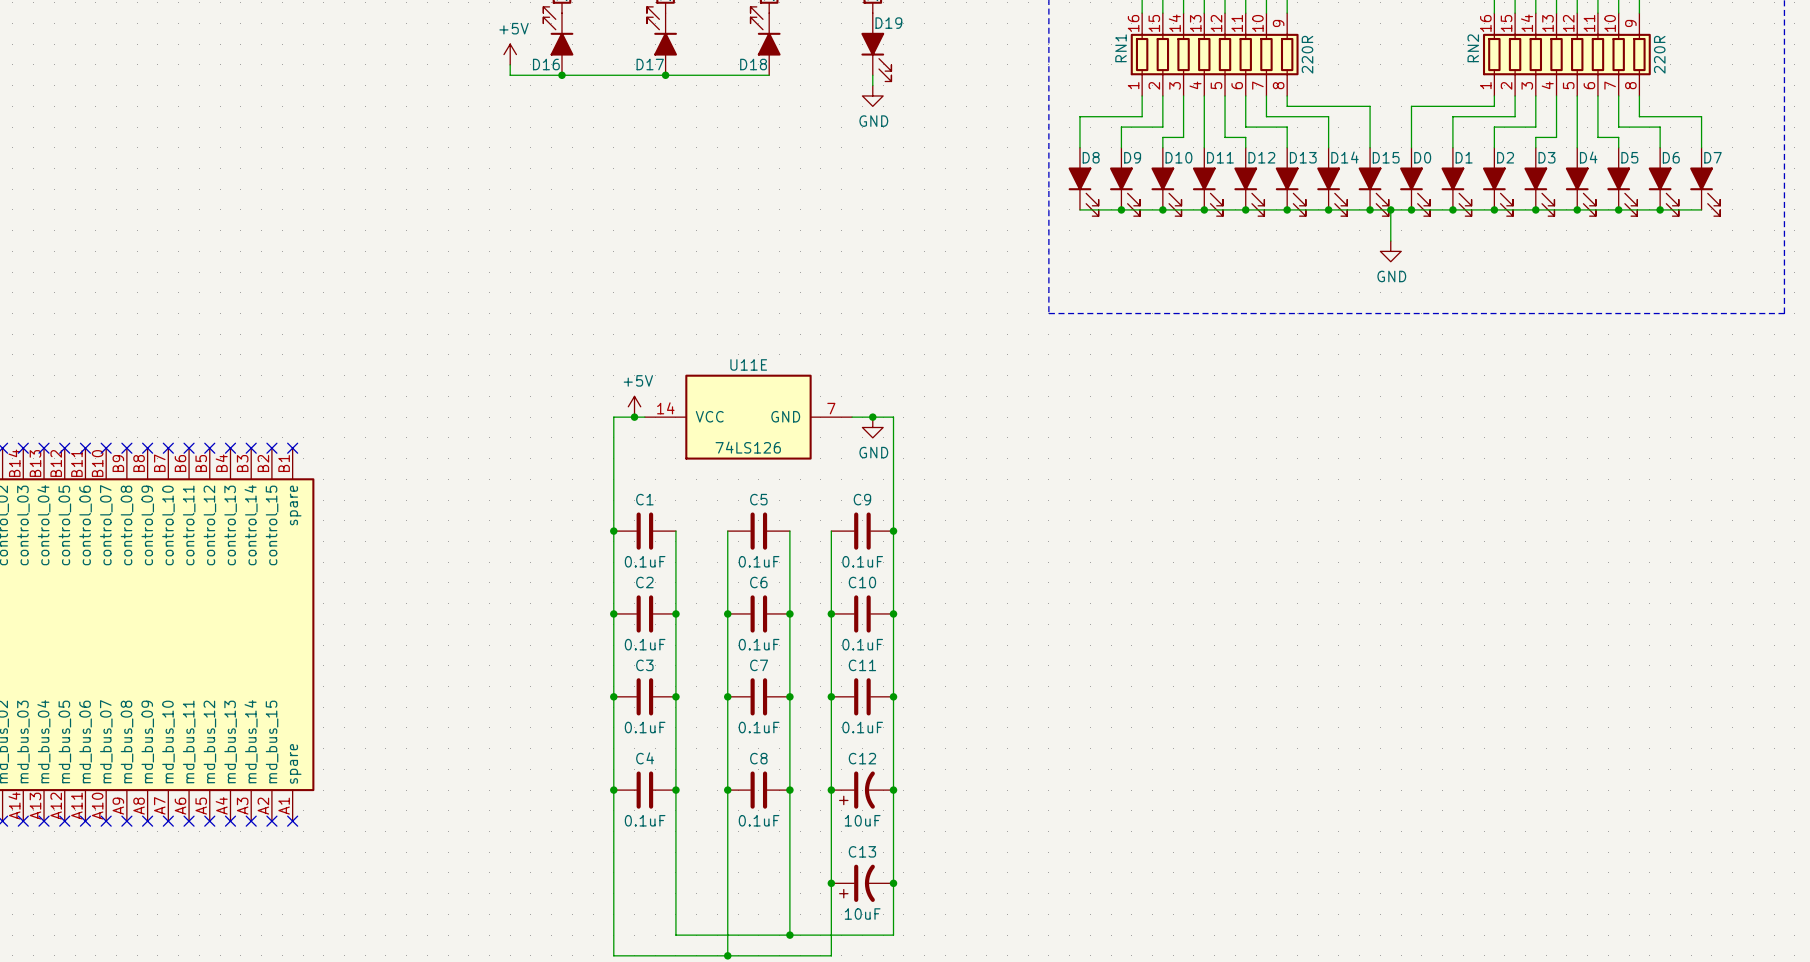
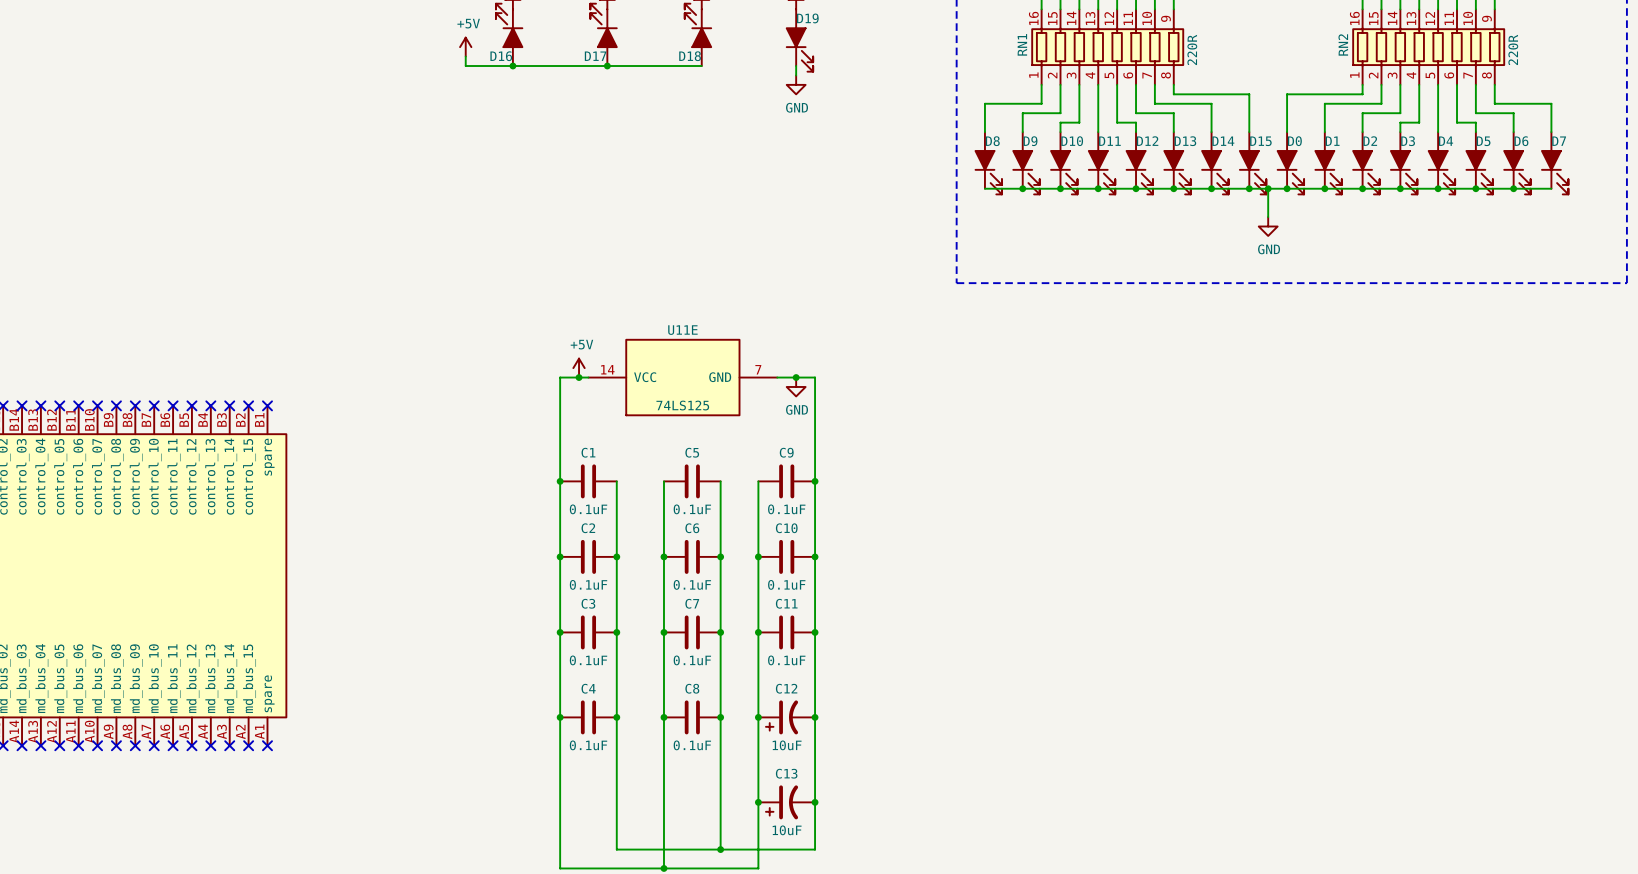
U11E value: 74LS126 (748, 447) -> 74LS125 (682, 405)

